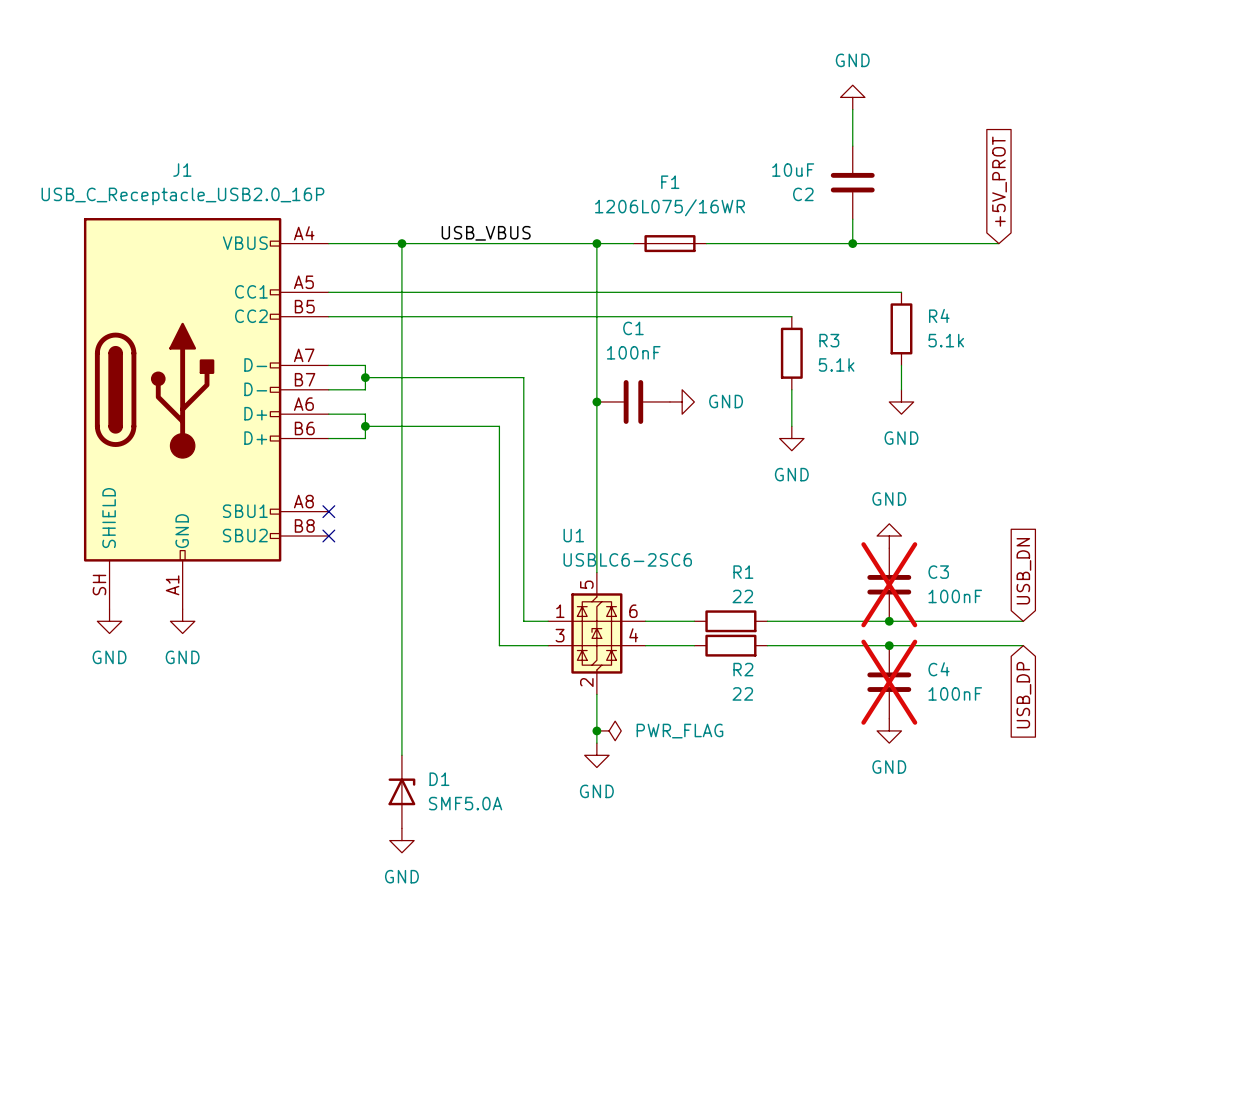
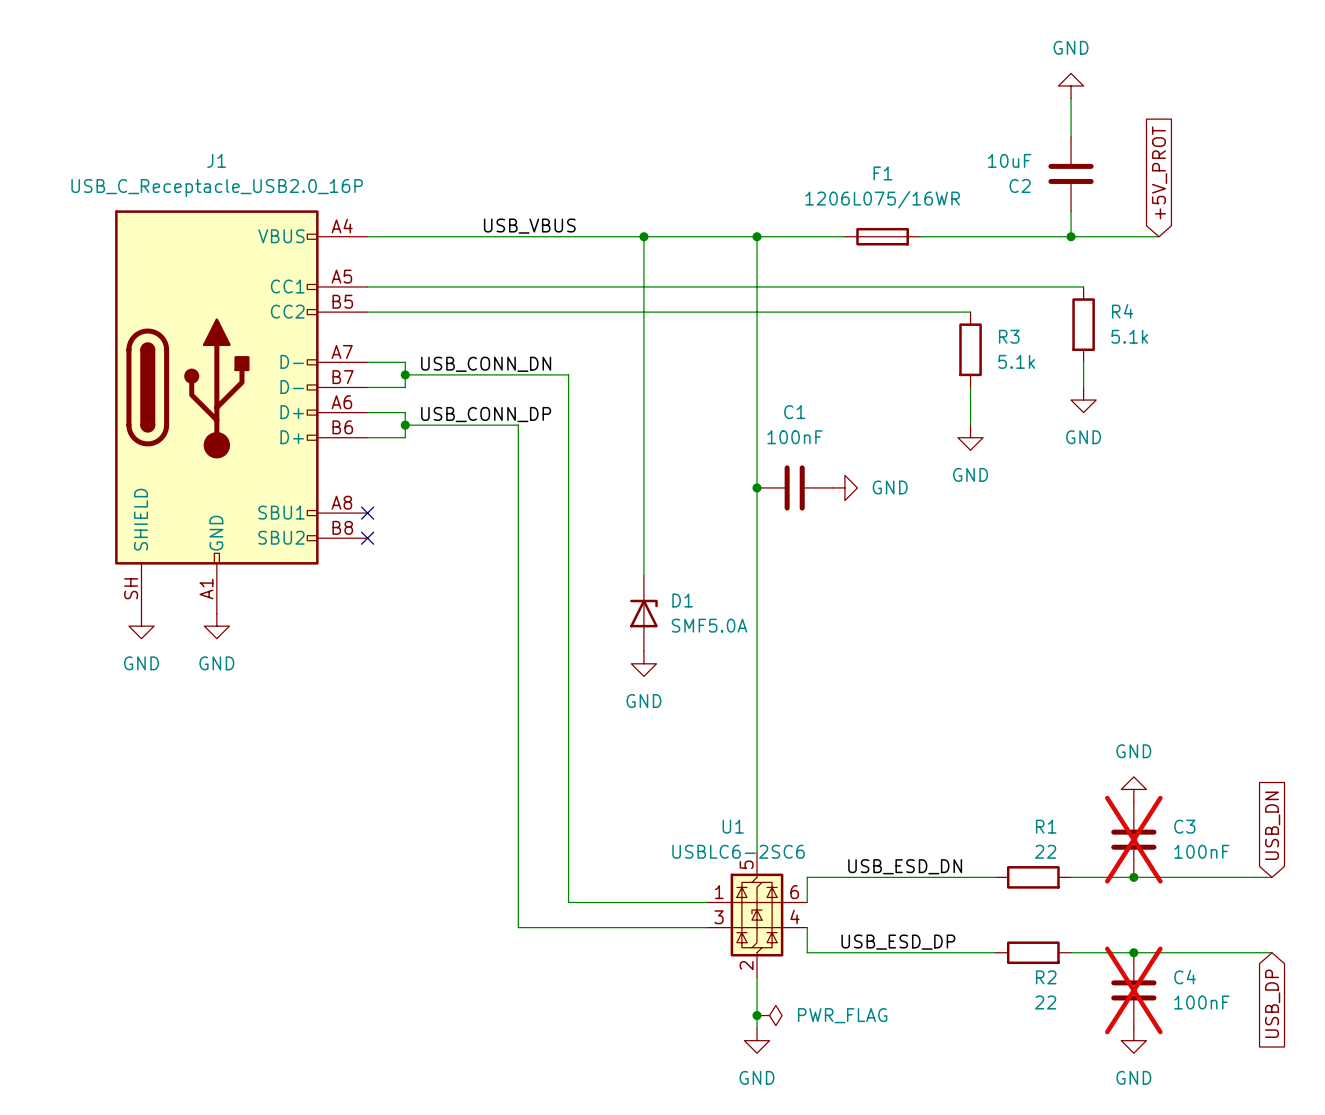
power symbol position: GND (852, 97) -> GND (1071, 85)
wire: (852, 109) (852, 146) -> (1071, 98) (1071, 136)
global label position: +5V_PROT (999, 181) -> +5V_PROT (1159, 172)
C2 position: (852, 182) -> (1071, 173)
wire: (852, 219) (852, 243) -> (1071, 211) (1071, 236)
wire: (401, 243) (401, 755) -> none
junction: (401, 243) -> none
wire: none -> (681, 236) (757, 236) (757, 852)
F1 position: (669, 243) -> (882, 236)
junction: none -> (757, 236)
junction: (852, 243) -> none
wire: none -> (1058, 236) (1158, 236)
junction: none -> (1071, 236)
wire: none -> (957, 286) (1083, 286)
wire: none -> (844, 312) (970, 312)
R4 position: (901, 328) -> (1083, 324)
R3 position: (791, 353) -> (970, 349)
wire: (901, 365) (901, 389) -> (1083, 362) (1083, 387)
label: none -> USB_CONN_DN (486, 364)
wire: (791, 389) (791, 426) -> (970, 387) (970, 425)
junction: (596, 401) -> none
C1 position: (633, 401) -> (794, 487)
power symbol: GND (682, 401) -> none
power symbol position: GND (901, 401) -> GND (970, 437)
power symbol: none -> GND (1083, 400)
label: none -> USB_CONN_DP (486, 414)
wire: (475, 426) (499, 426) (499, 645) (548, 645) -> (518, 425) (518, 927) (706, 927)
power symbol rotation: 0° (791, 438) -> 90° counterclockwise (844, 487)
power symbol position: GND (791, 438) -> GND (844, 487)
junction: none -> (757, 487)
U1 name position: U1 (573, 535) -> U1 (733, 826)
power symbol: GND (889, 536) -> none
U1 value position: USBLC6-2SC6 (627, 559) -> USBLC6-2SC6 (738, 851)
global label: USB_DN (1023, 571) -> none
C3 position: (889, 584) -> (1133, 839)
wire: (523, 621) (548, 621) -> (568, 626) (568, 902) (706, 902)
wire: (645, 621) (694, 621) -> none
R1 position: (730, 621) -> (1033, 877)
wire: (767, 621) (1023, 621) -> none
junction: (889, 621) -> none
U1 position: (596, 633) -> (757, 915)
wire: (645, 645) (694, 645) -> none
R2 position: (730, 645) -> (1033, 952)
wire: (767, 645) (1023, 645) -> none
junction: (889, 645) -> none
C4 position: (889, 682) -> (1133, 990)
wire: (596, 694) (596, 743) -> none
global label: USB_DP (1023, 695) -> none
junction: (596, 730) -> none
power symbol: PWR_FLAG (609, 730) -> none
power symbol: GND (889, 730) -> none
power symbol position: GND (596, 755) -> GND (643, 663)
power symbol: none -> GND (1133, 789)
D1 position: (401, 791) -> (643, 613)
global label: none -> USB_DN (1272, 825)
power symbol: GND (401, 840) -> none
label: none -> USB_ESD_DN (905, 866)
wire: none -> (995, 877) (807, 877) (807, 902)
wire: none -> (1071, 877) (1272, 877)
junction: none -> (1133, 877)
wire: none -> (807, 927) (807, 952) (995, 952)
label: none -> USB_ESD_DP (898, 942)
wire: none -> (1071, 952) (1272, 952)
junction: none -> (1133, 952)
wire: none -> (757, 977) (757, 1028)
global label: none -> USB_DP (1272, 1003)
junction: none -> (757, 1015)
power symbol: none -> PWR_FLAG (769, 1015)
power symbol: none -> GND (757, 1040)
power symbol: none -> GND (1133, 1040)

